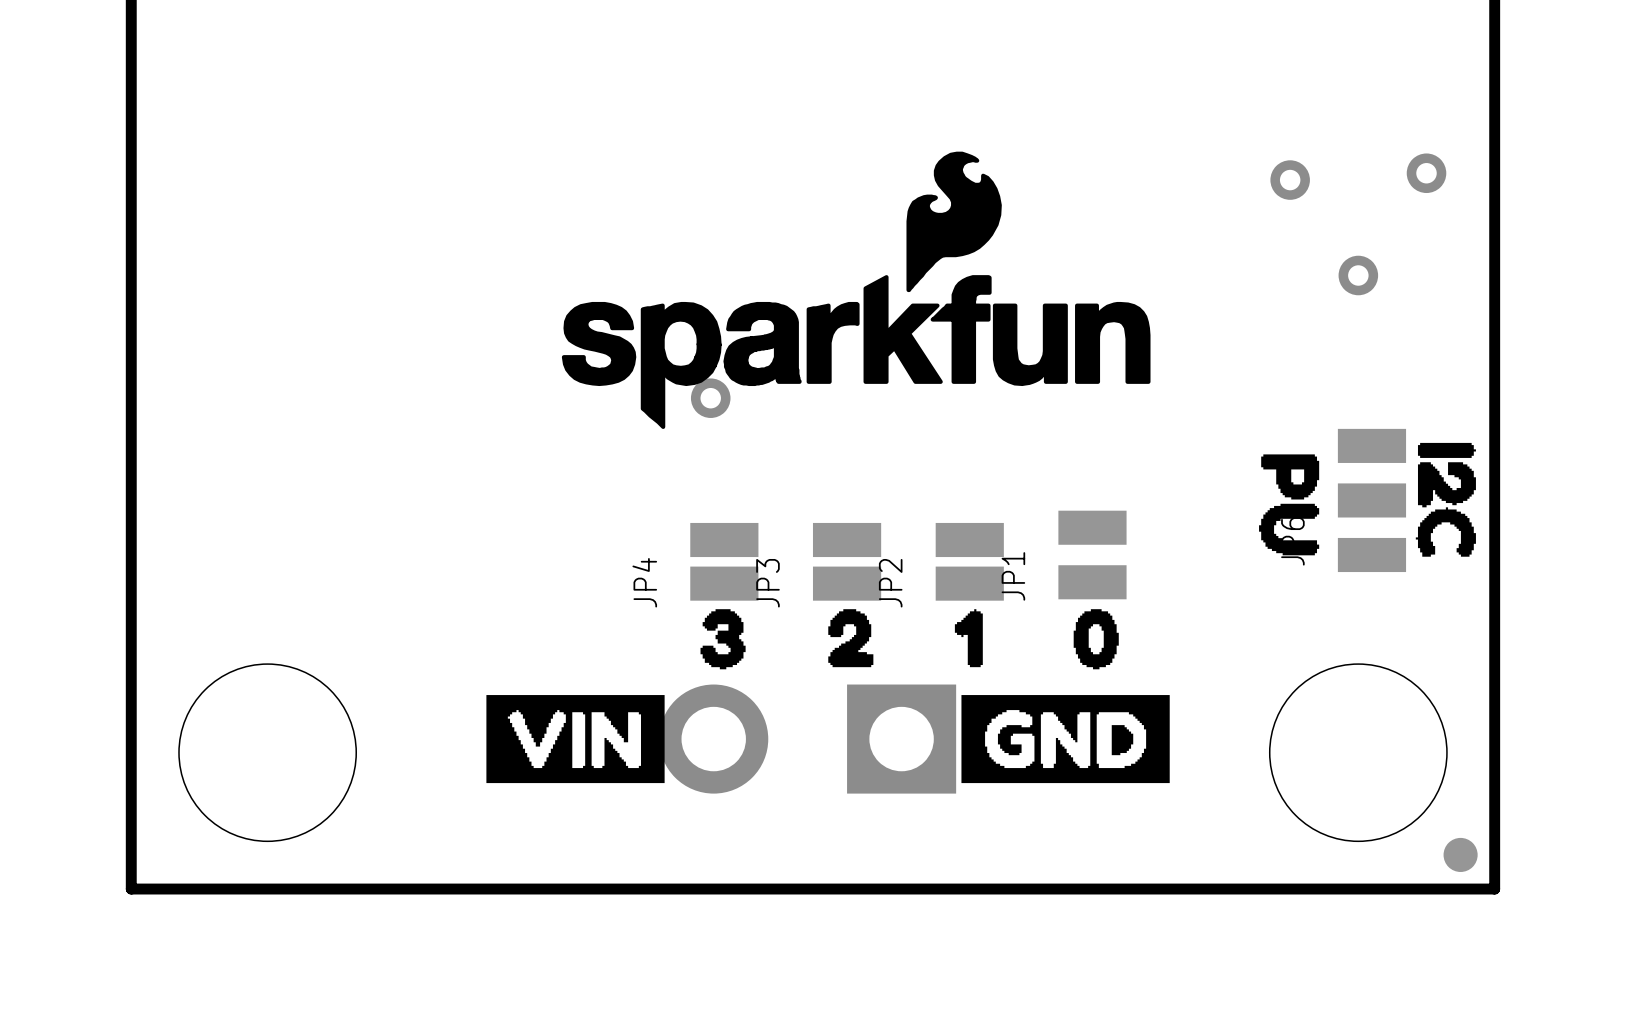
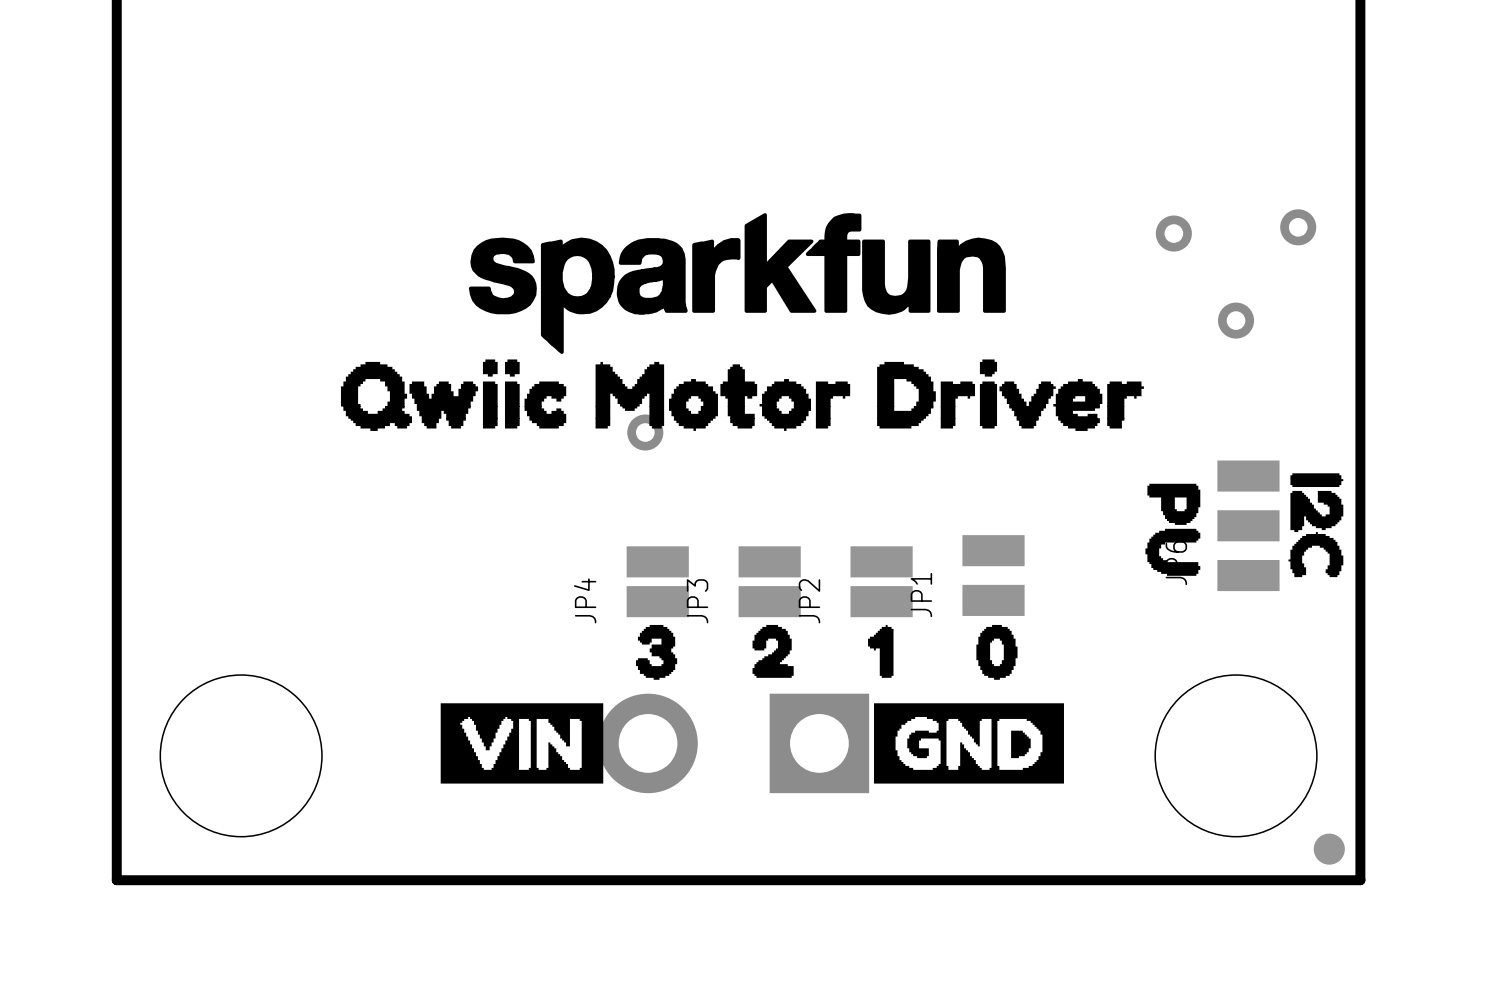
drawing: [561, 151, 1151, 429] -> none
drawing: none -> [340, 213, 1144, 431]

